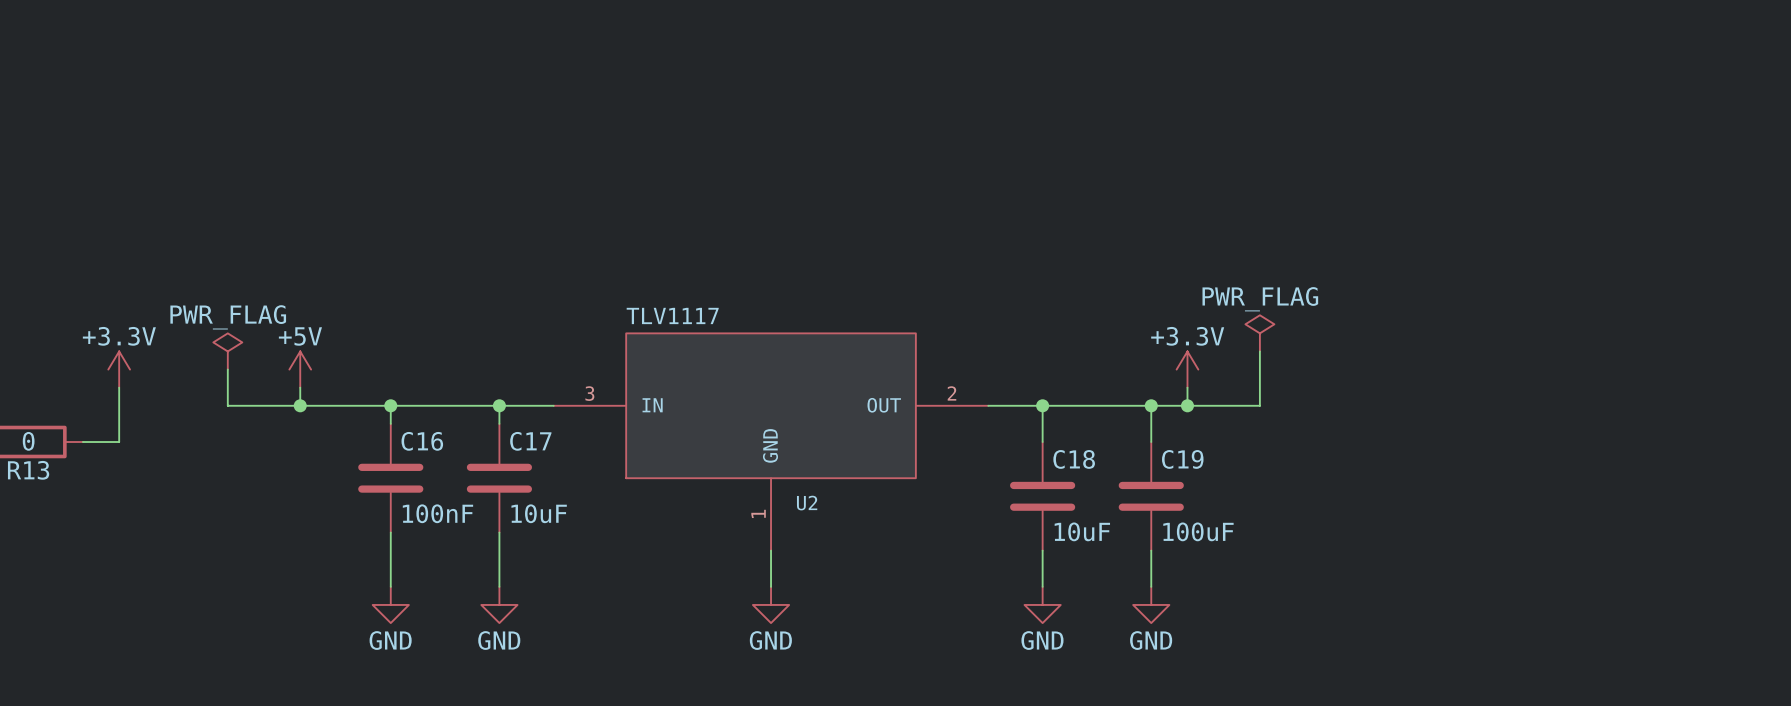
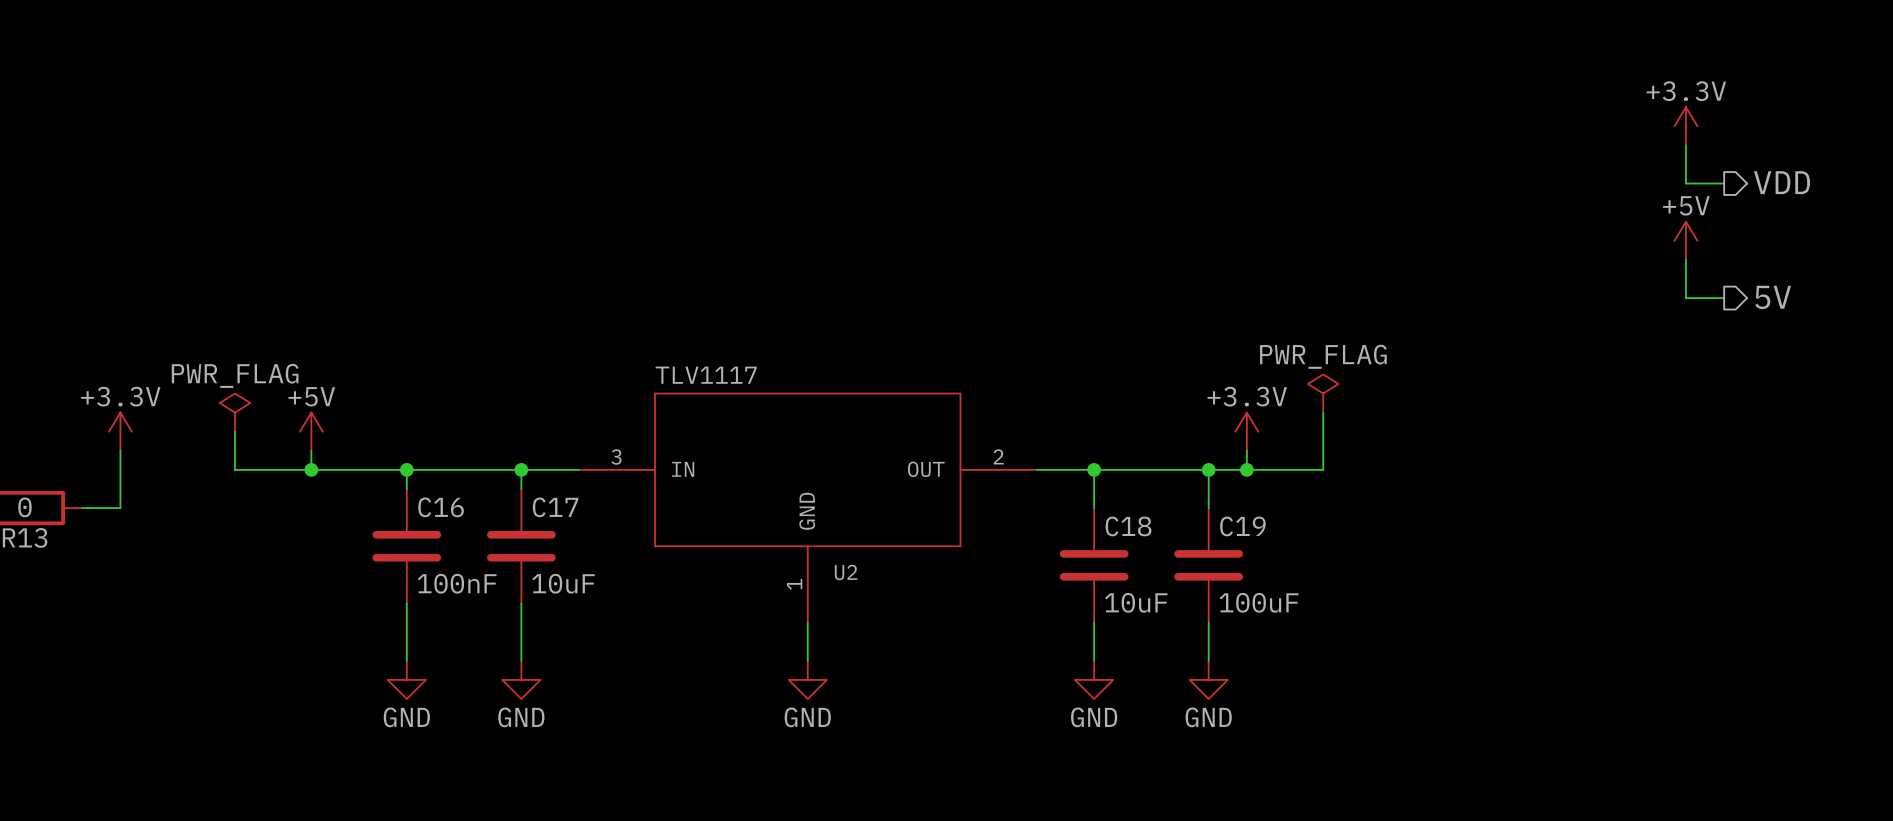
power symbol: none -> +3.3V (1685, 126)
wire: none -> (1685, 145) (1685, 183) (1724, 183)
hierarchical label: none -> VDD (1782, 182)
power symbol: none -> +5V (1685, 240)
wire: none -> (1685, 259) (1685, 298) (1724, 298)
hierarchical label: none -> 5V (1773, 297)

